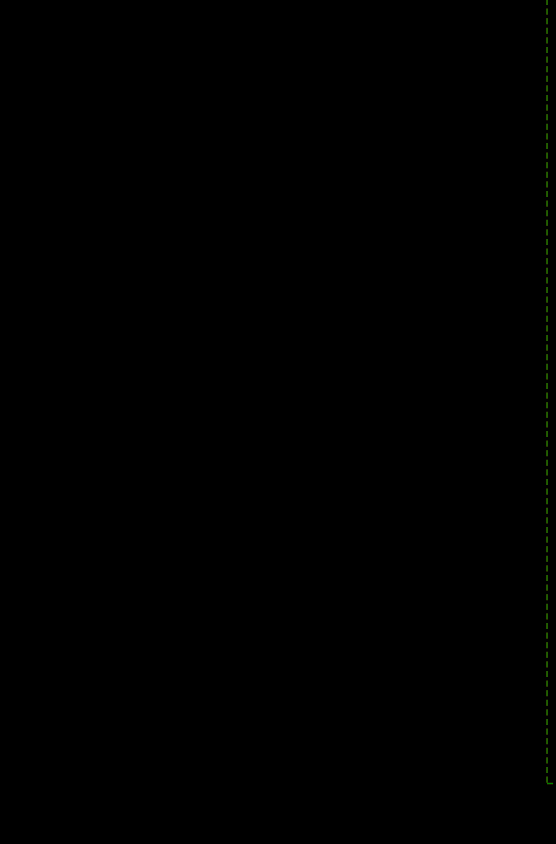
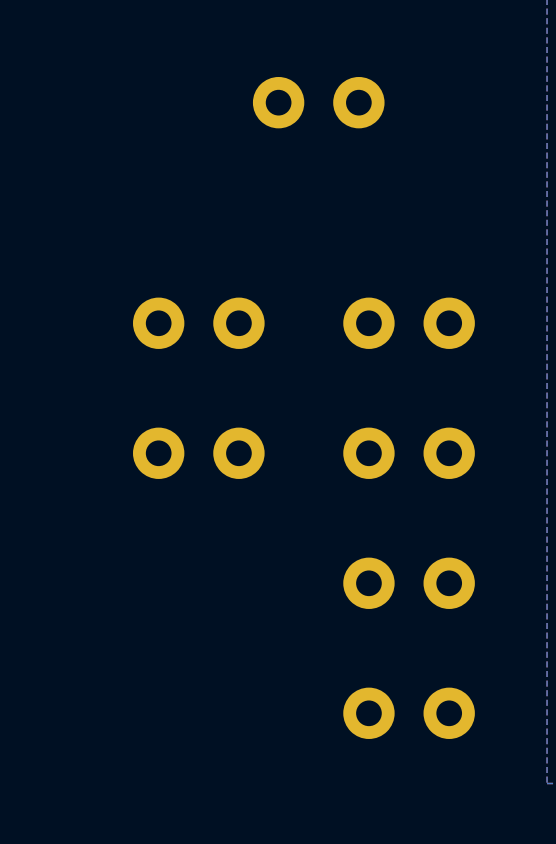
part: none -> (318, 102)
part: none -> (198, 323)
part: none -> (409, 323)
part: none -> (198, 453)
part: none -> (409, 453)
part: none -> (409, 583)
part: none -> (409, 713)

